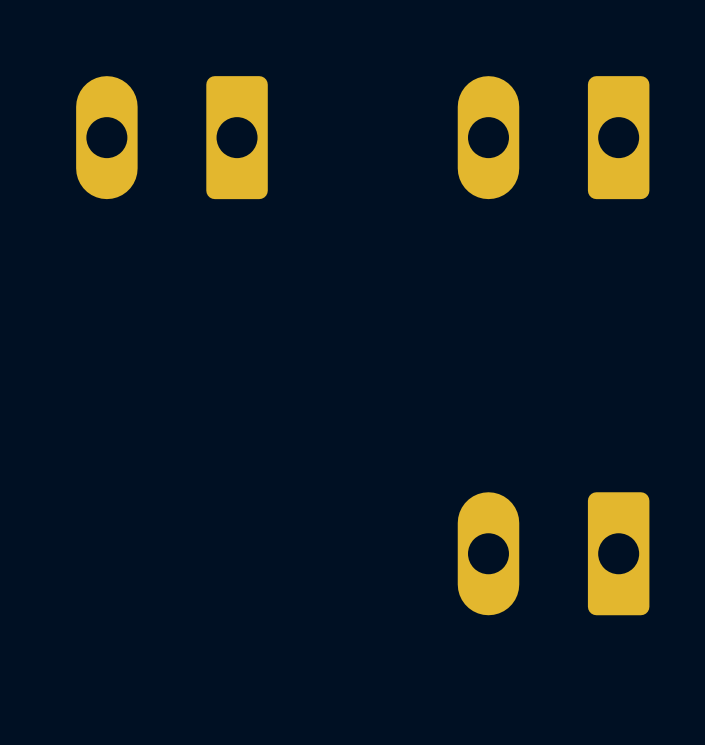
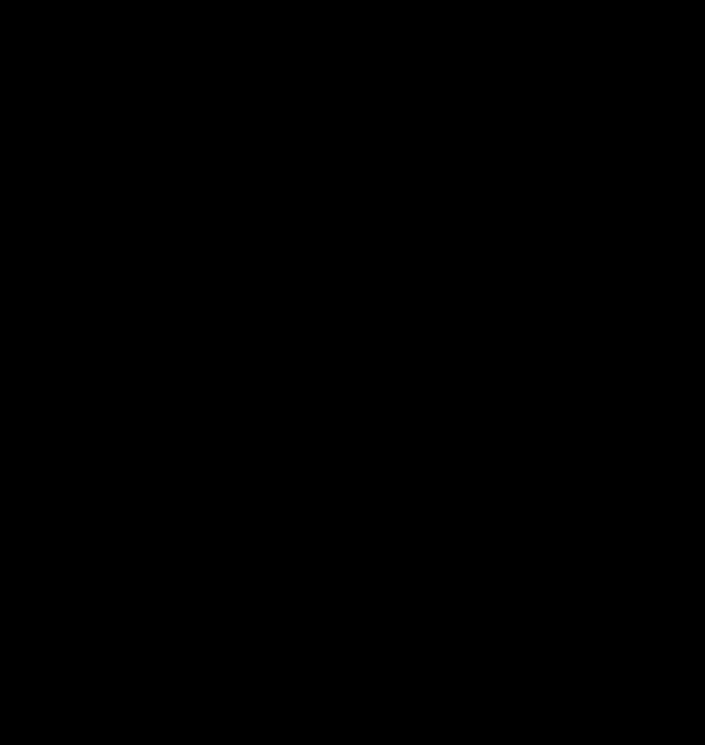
part: (171, 137) -> none
part: (553, 137) -> none
part: (553, 553) -> none

